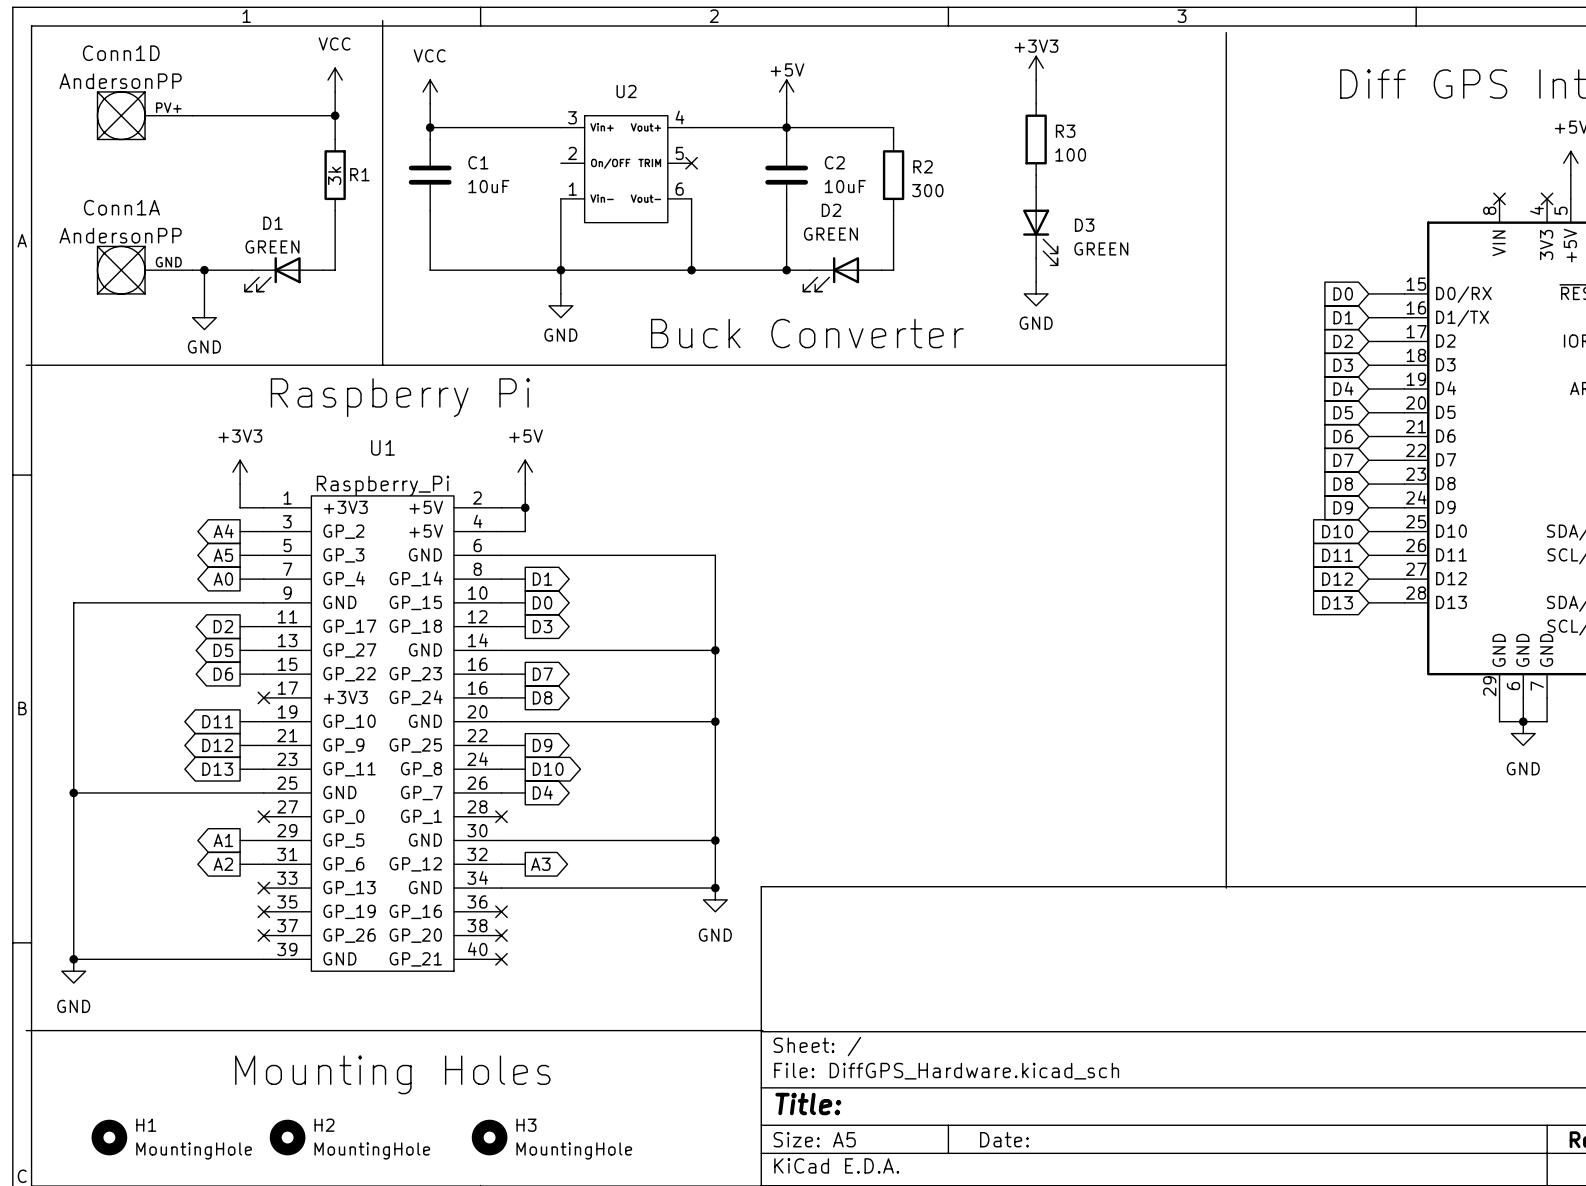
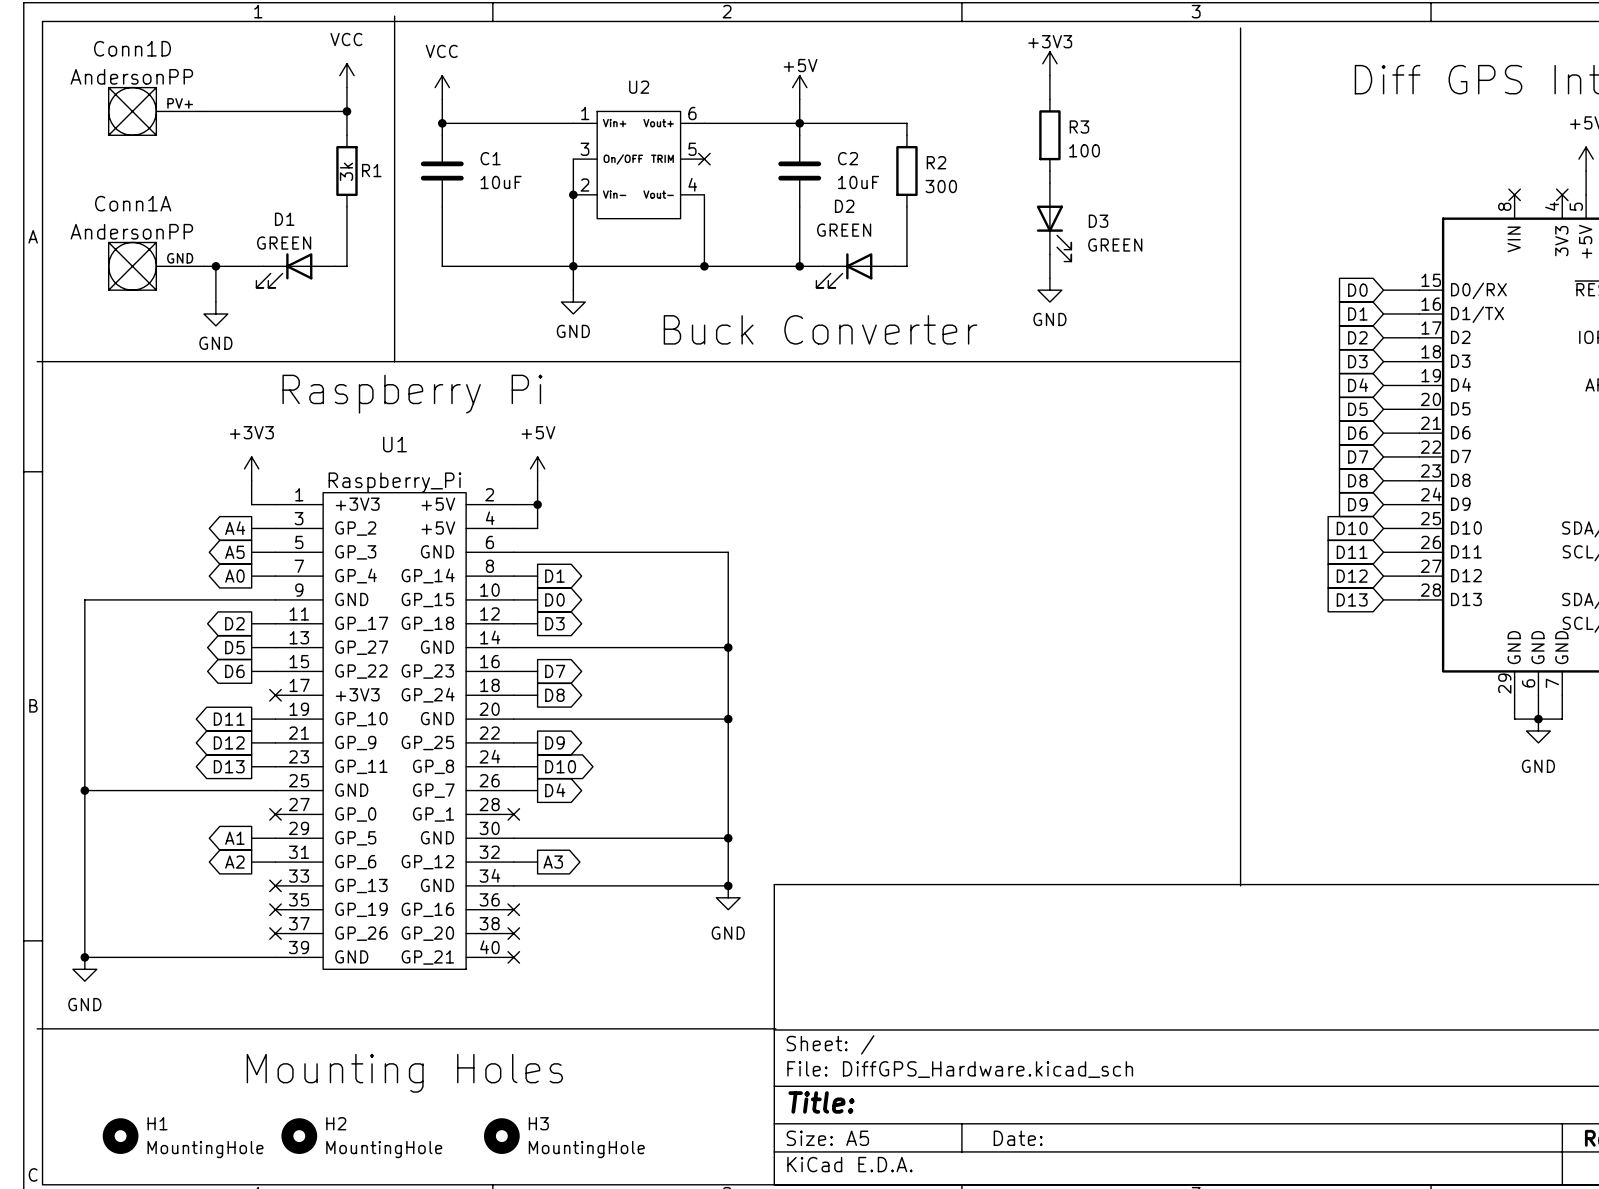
U2 pin number: 3 (572, 117) -> 1 (585, 113)
U2 pin number: 4 (679, 117) -> 6 (692, 113)
U2 pin number: 2 (572, 153) -> 3 (584, 149)
wire: none -> (573, 159) (573, 194)
U2 pin number: 1 (572, 189) -> 2 (584, 185)
U2 pin number: 6 (679, 189) -> 4 (692, 184)
junction: none -> (573, 194)
U1 pin number: 16 (477, 688) -> 18 (489, 685)

